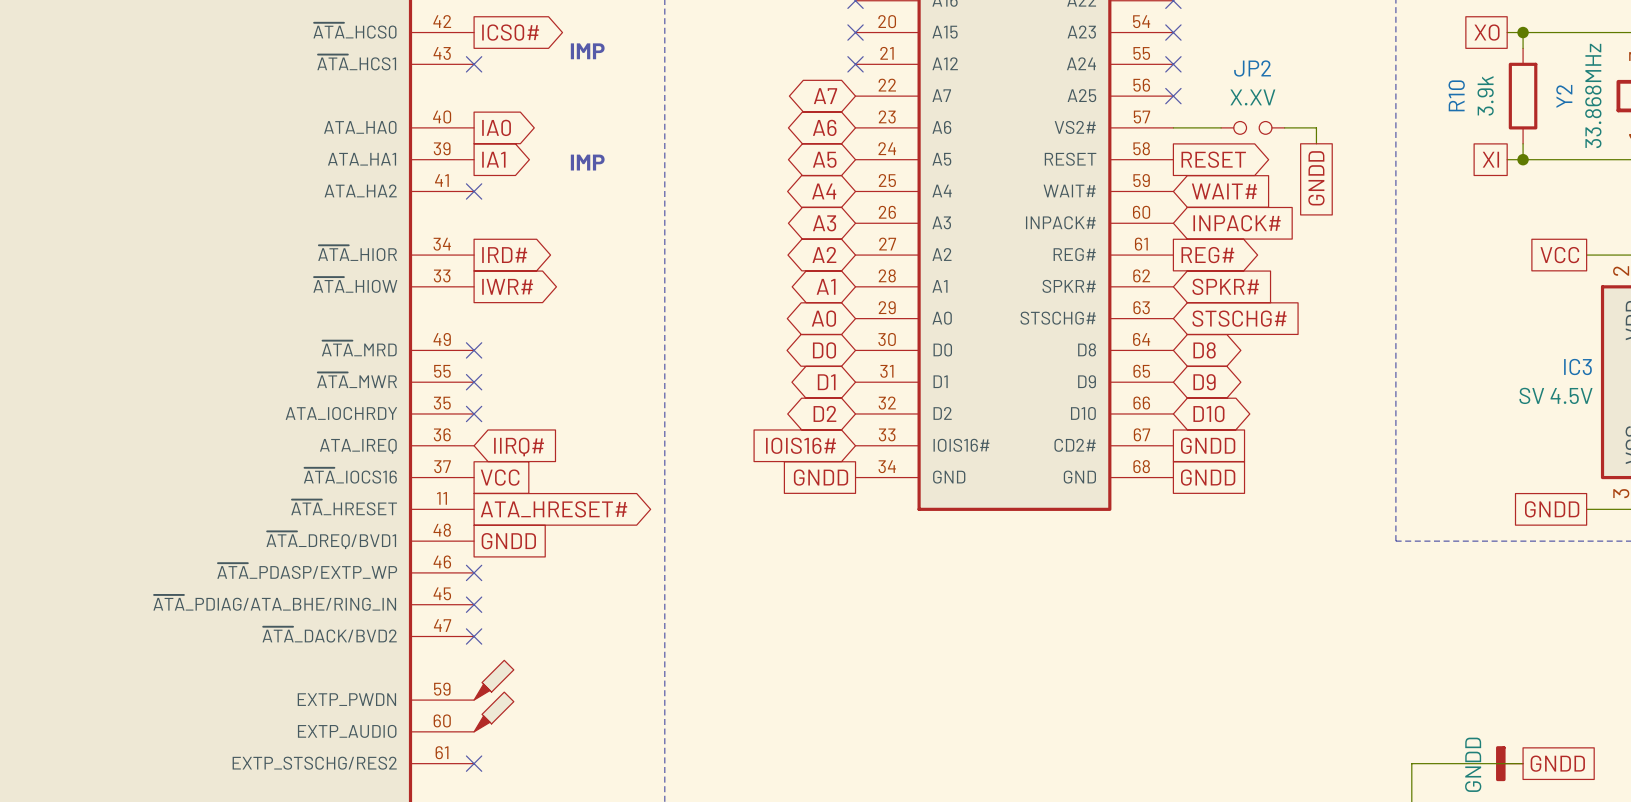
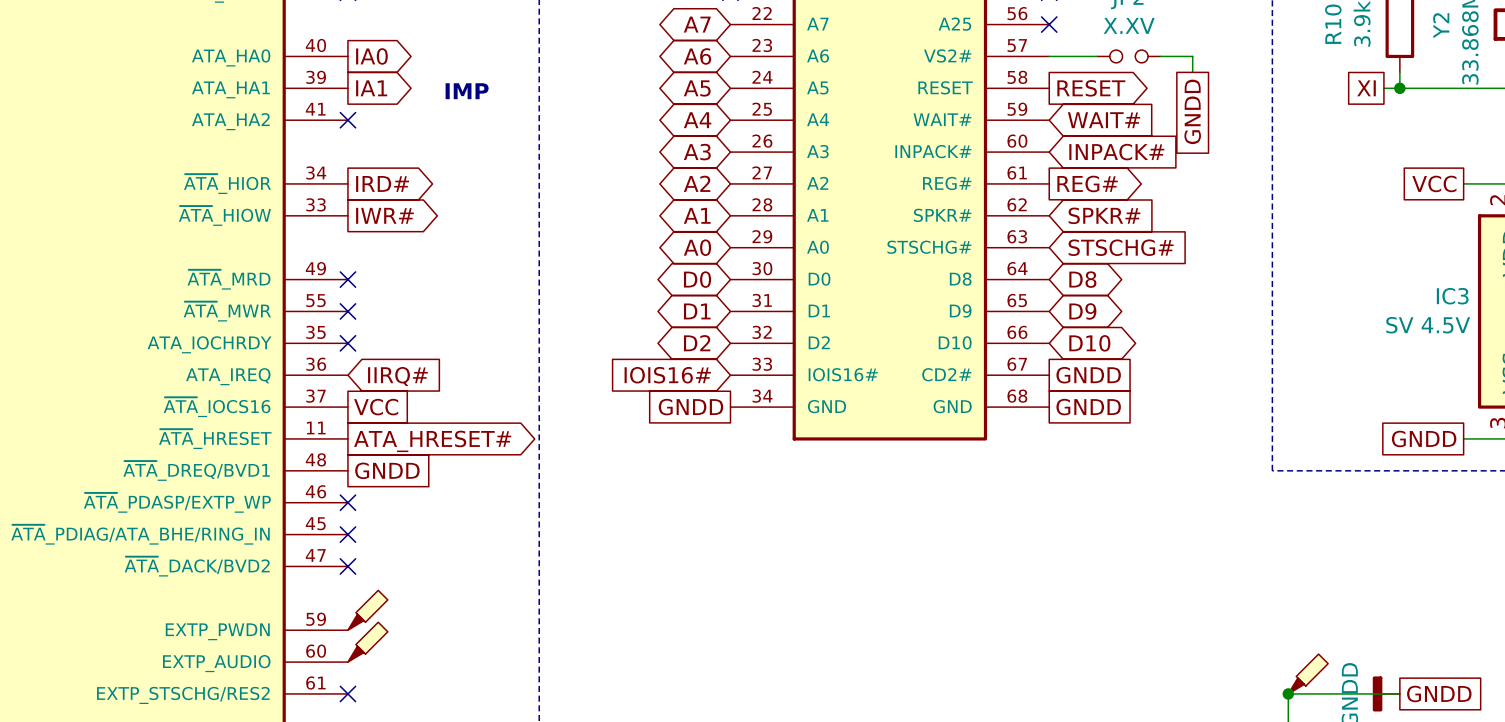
part: none -> (1308, 674)
junction: none -> (1288, 693)

